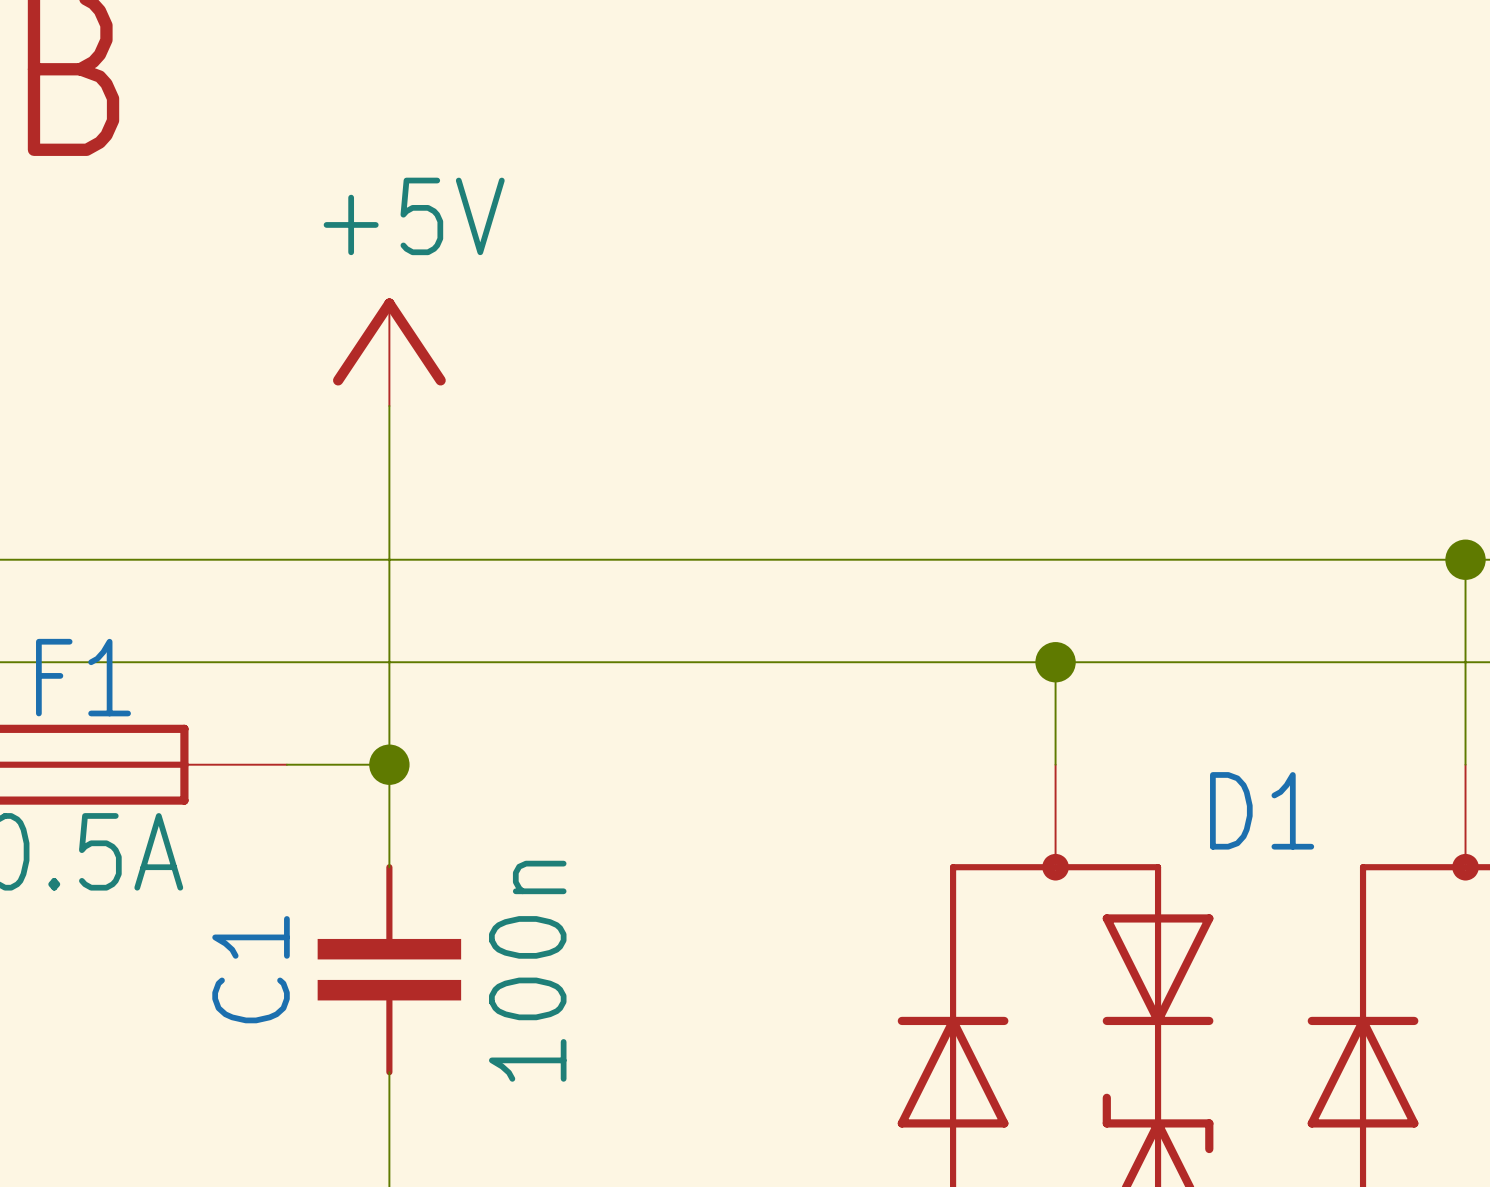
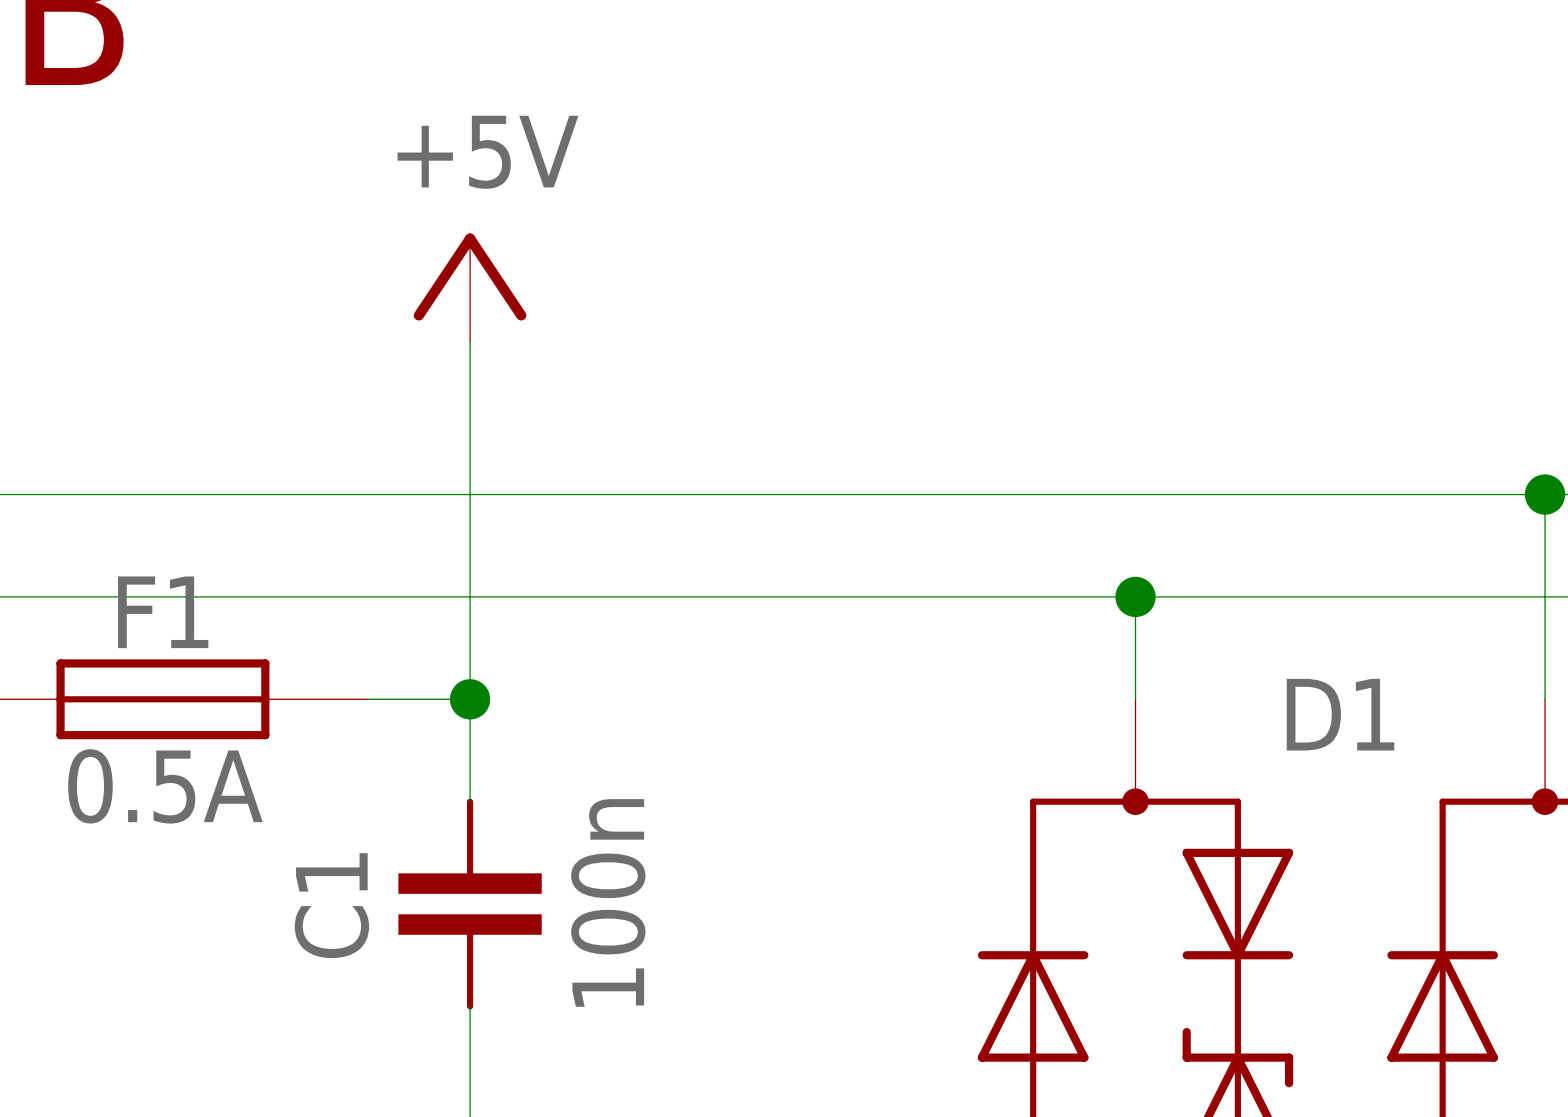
D1 name position: D1 (1262, 810) -> D1 (1340, 714)

